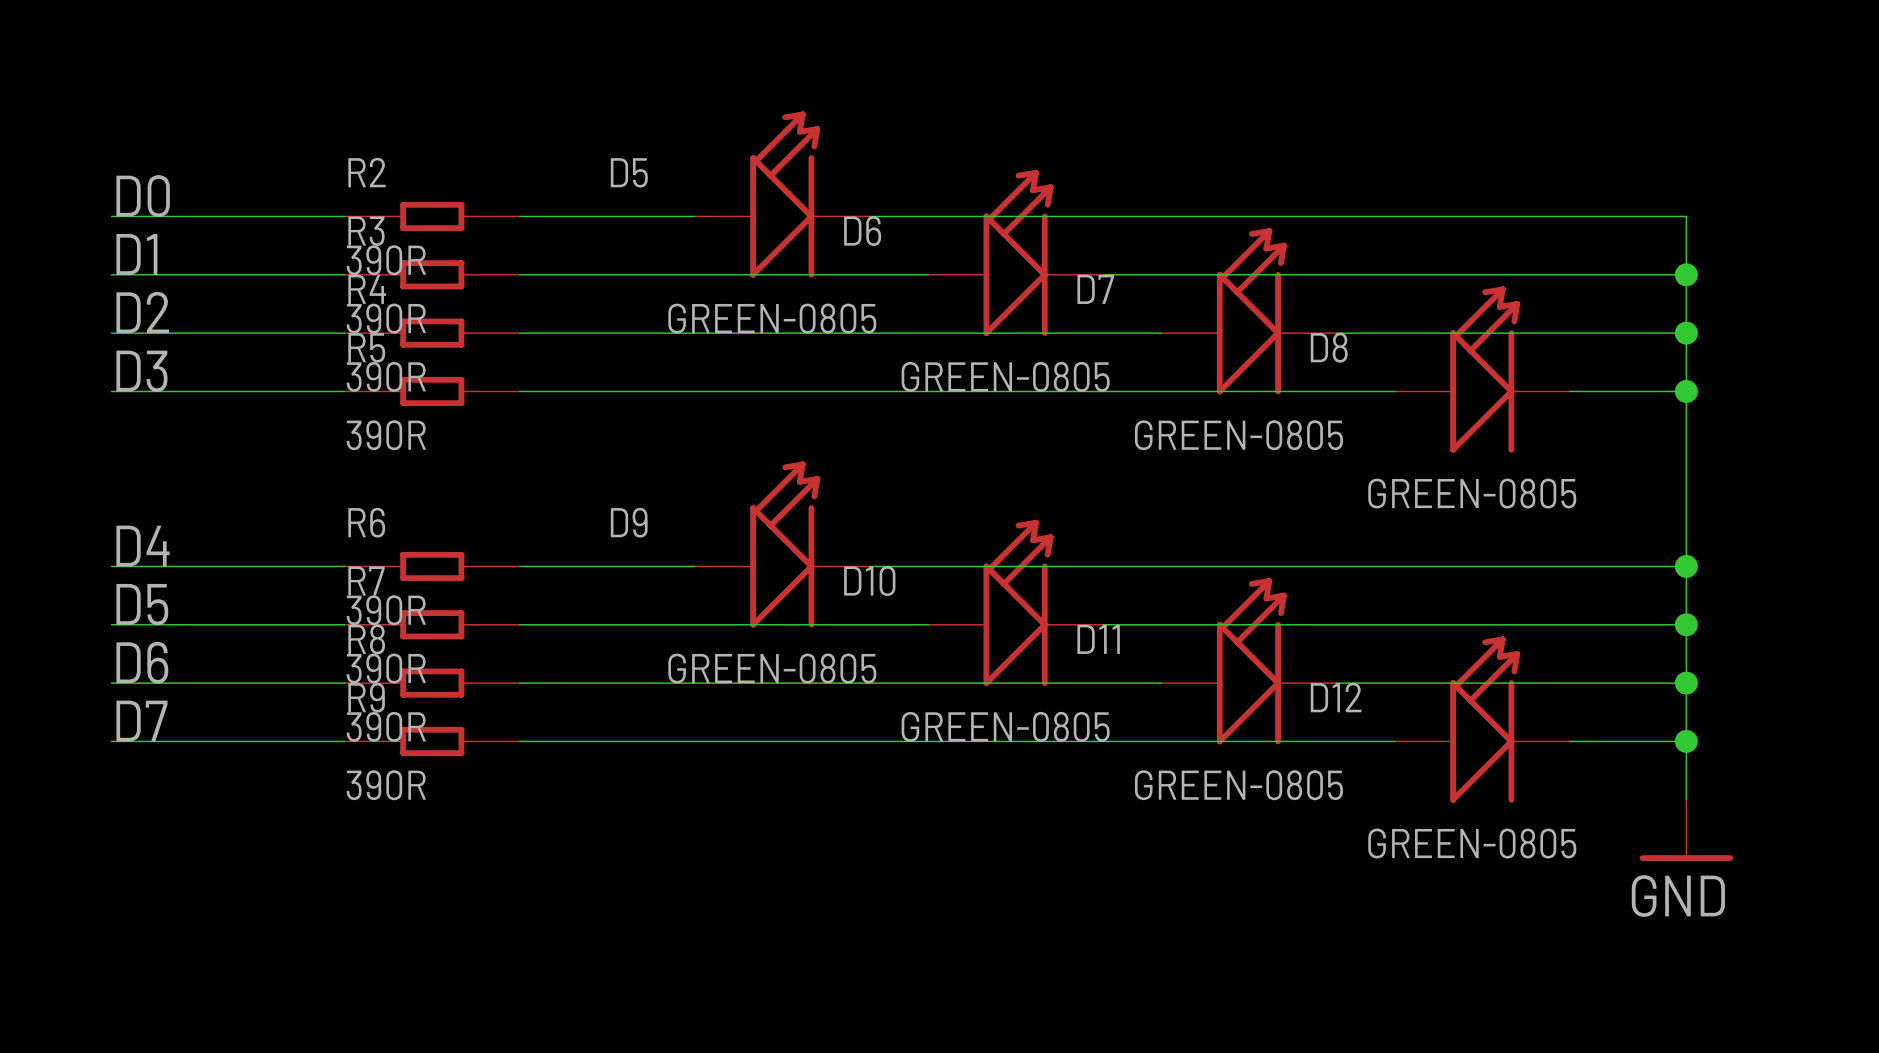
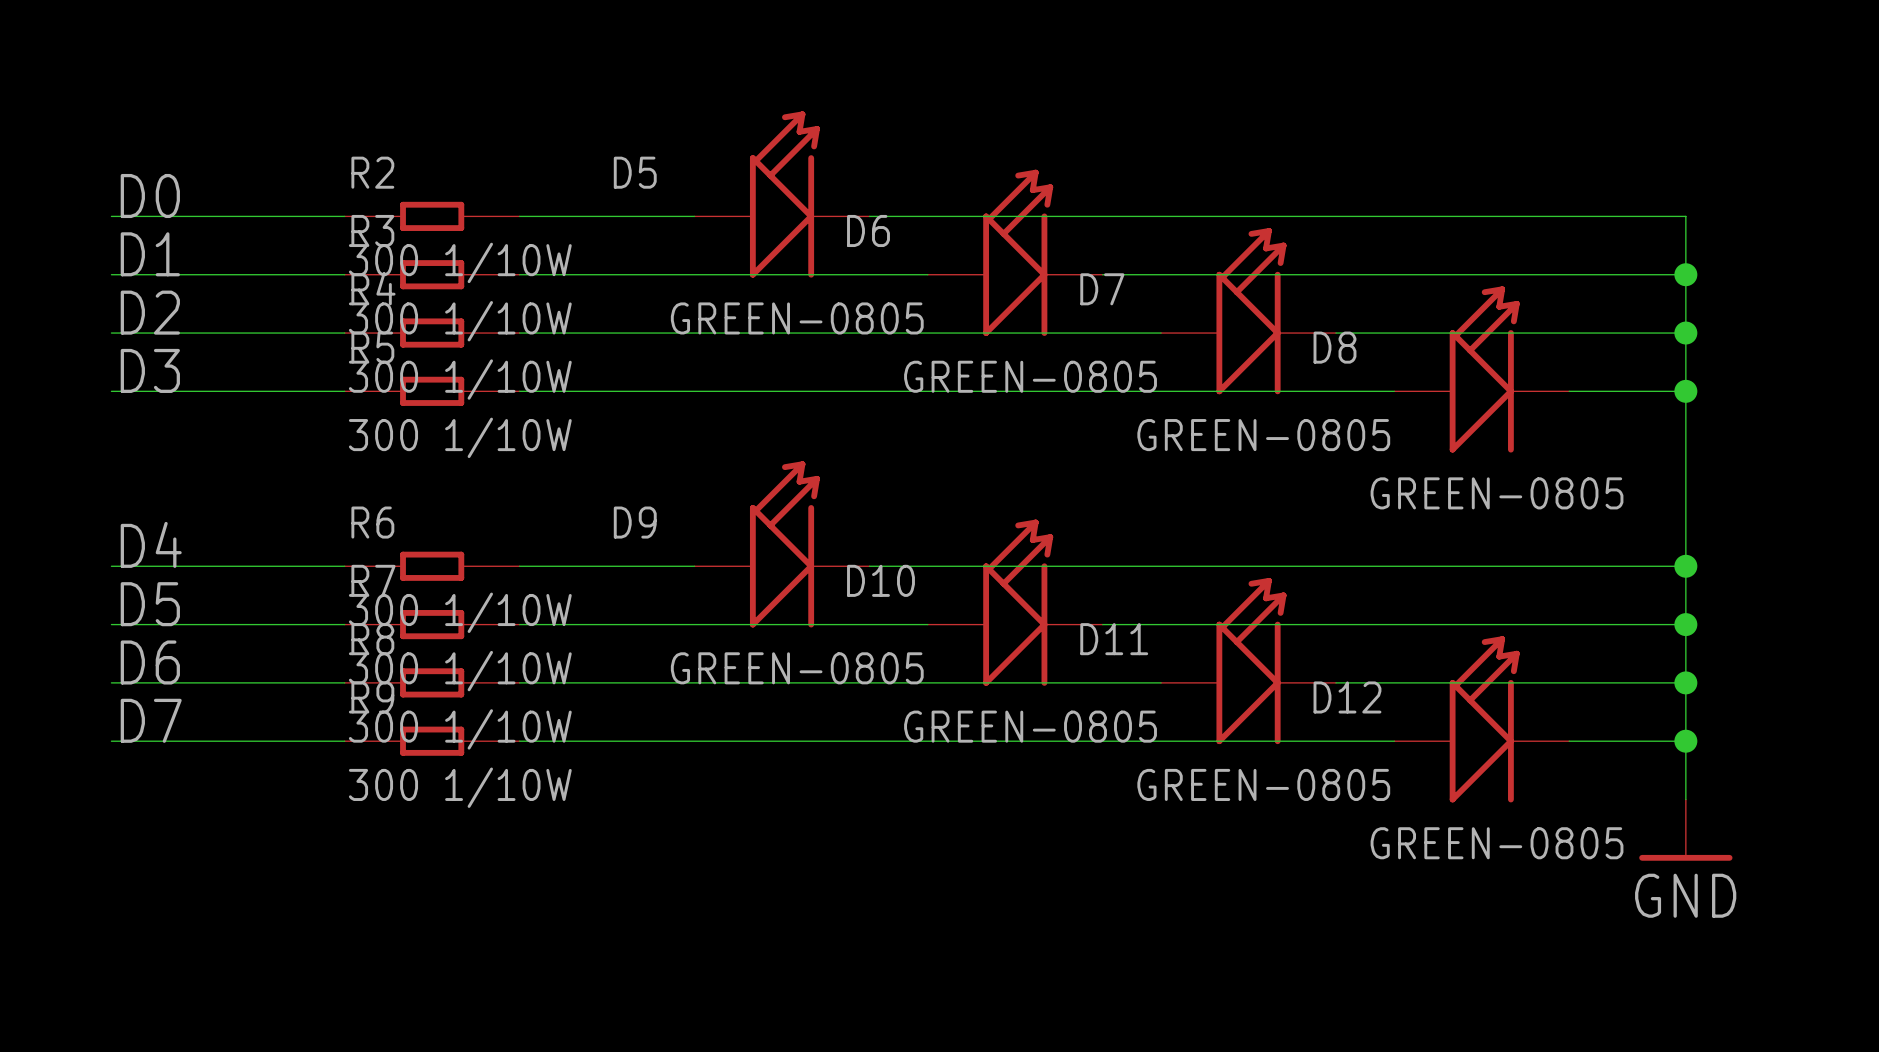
R2 value: 390R (386, 260) -> 300 1/10W (460, 262)
R3 value: 390R (386, 318) -> 300 1/10W (460, 321)
R4 value: 390R (386, 376) -> 300 1/10W (460, 379)
R5 value: 390R (386, 435) -> 300 1/10W (460, 437)
R6 value: 390R (386, 610) -> 300 1/10W (460, 612)
R7 value: 390R (386, 668) -> 300 1/10W (460, 671)
R8 value: 390R (386, 726) -> 300 1/10W (460, 729)
R9 value: 390R (386, 785) -> 300 1/10W (460, 787)

